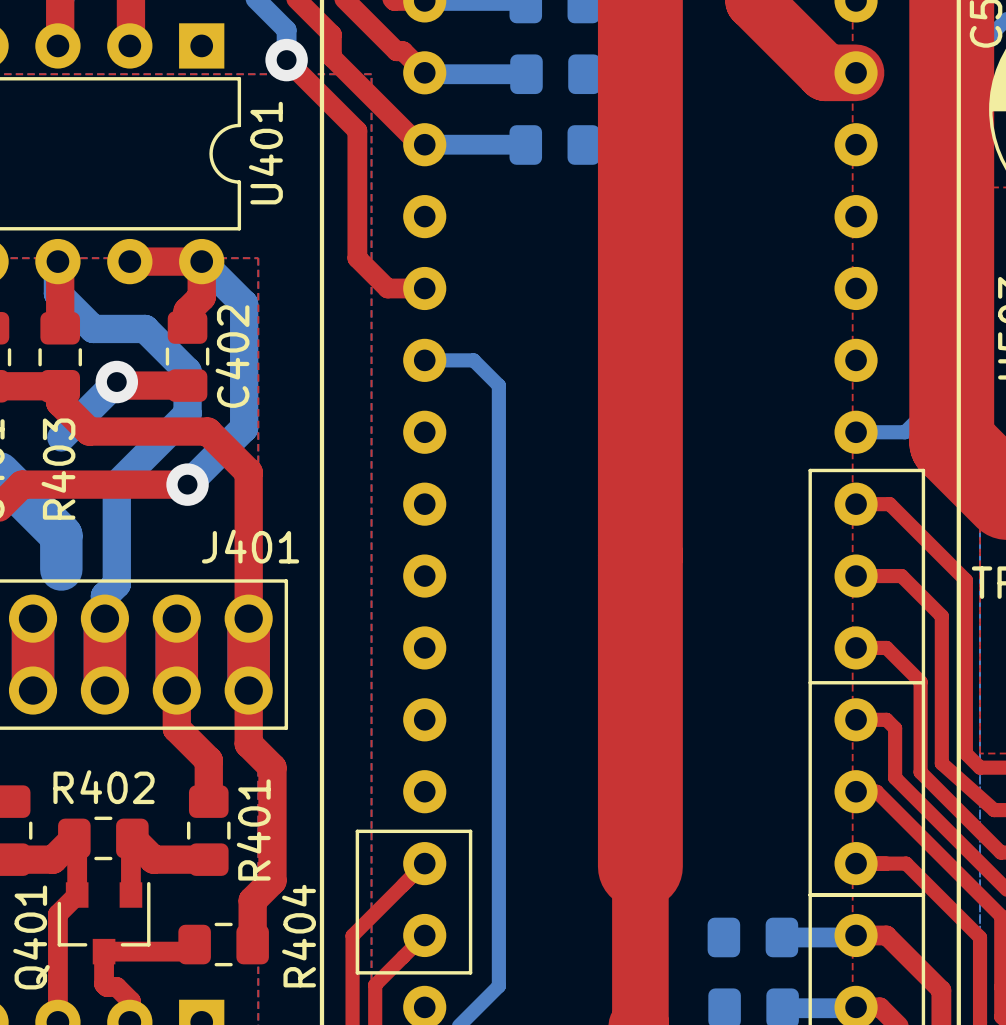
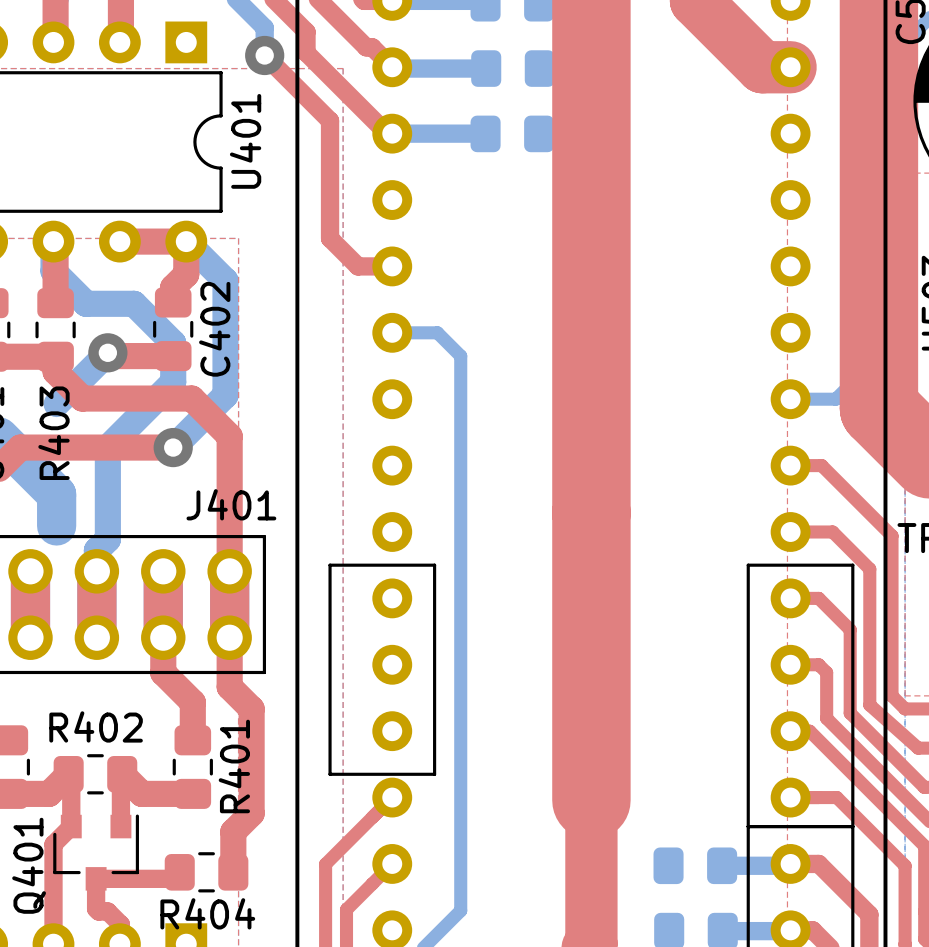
line: (810, 611) (810, 470) (923, 470) (923, 611) -> (748, 565) (852, 565)
line: (810, 682) (923, 682) -> none
line: (357, 831) (470, 831) -> (330, 767) (330, 565) (434, 565) (434, 767)
line: (357, 838) (357, 972) (470, 972) (470, 838) -> (330, 774) (434, 774)
R404 name rotation: 0° (299, 936) -> 90° clockwise (207, 913)

